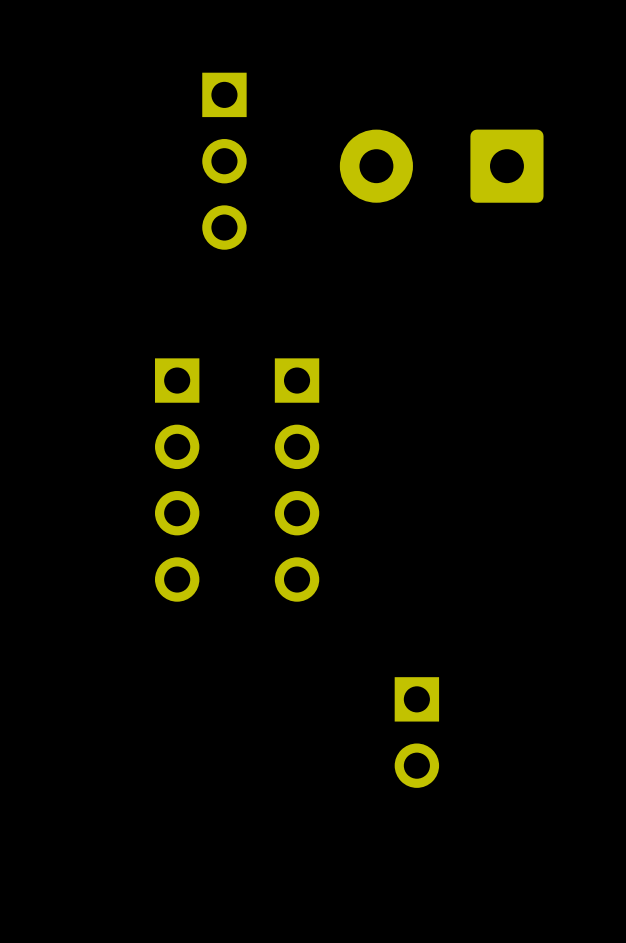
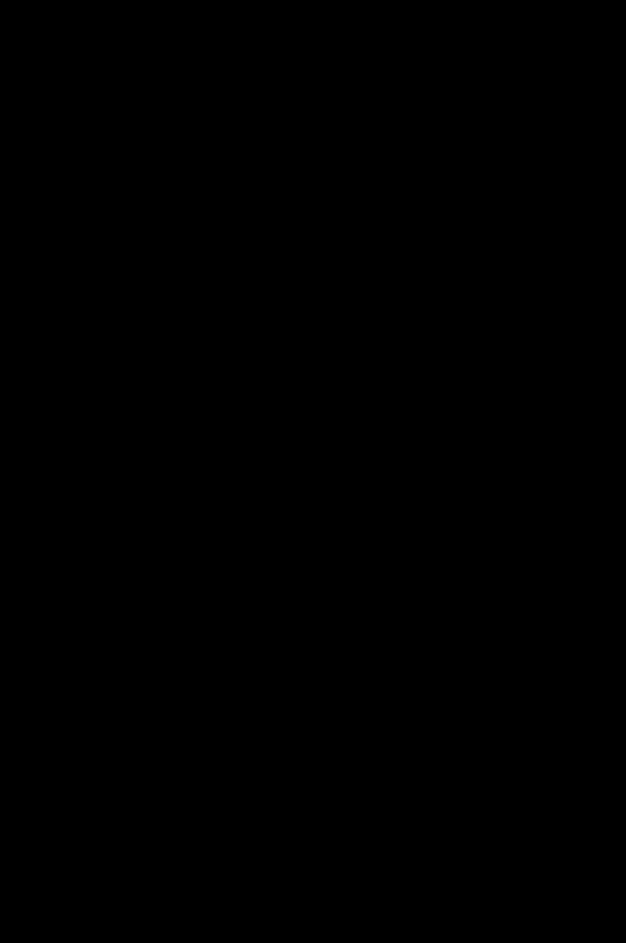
part: (224, 161) -> none
part: (441, 166) -> none
part: (177, 480) -> none
part: (297, 480) -> none
part: (416, 732) -> none

